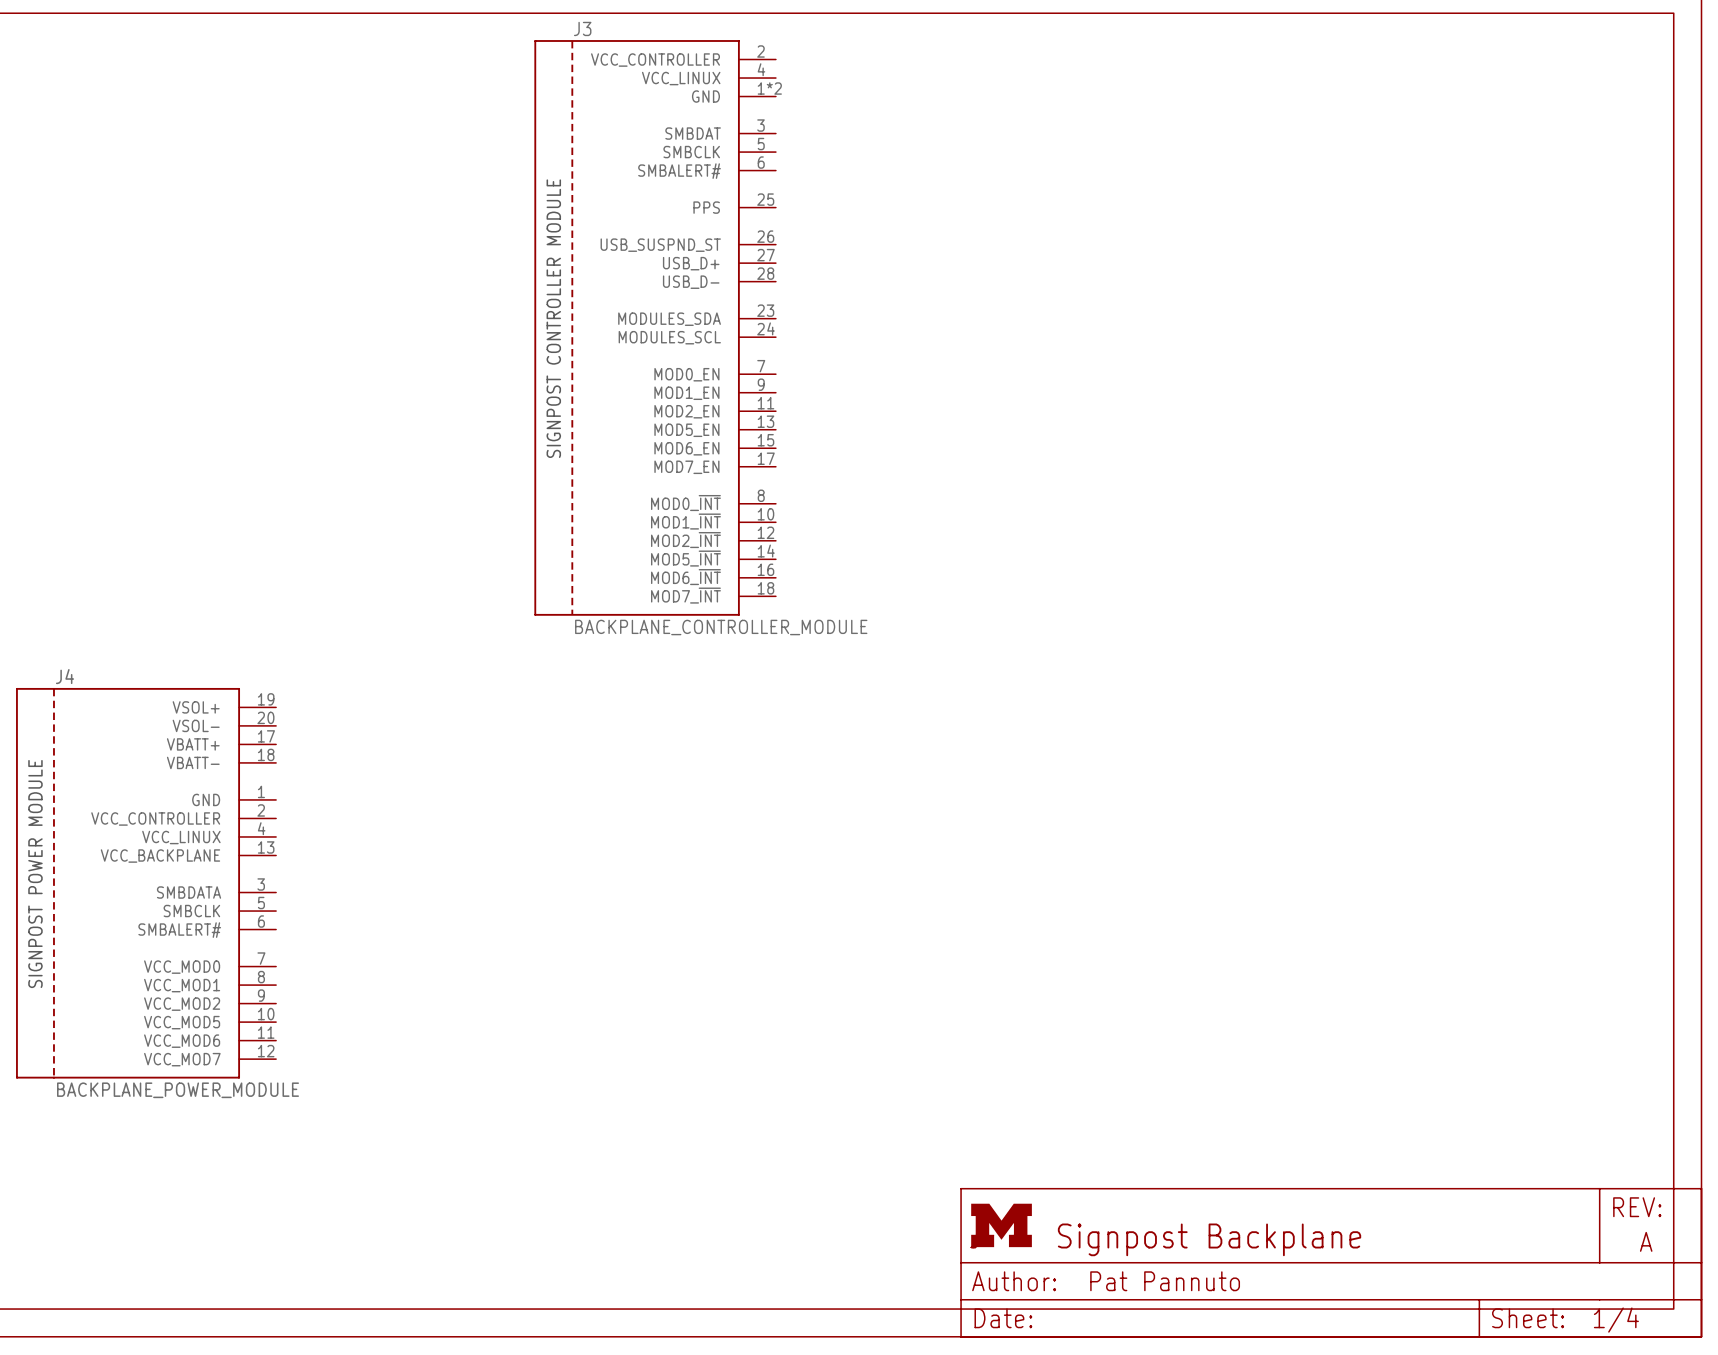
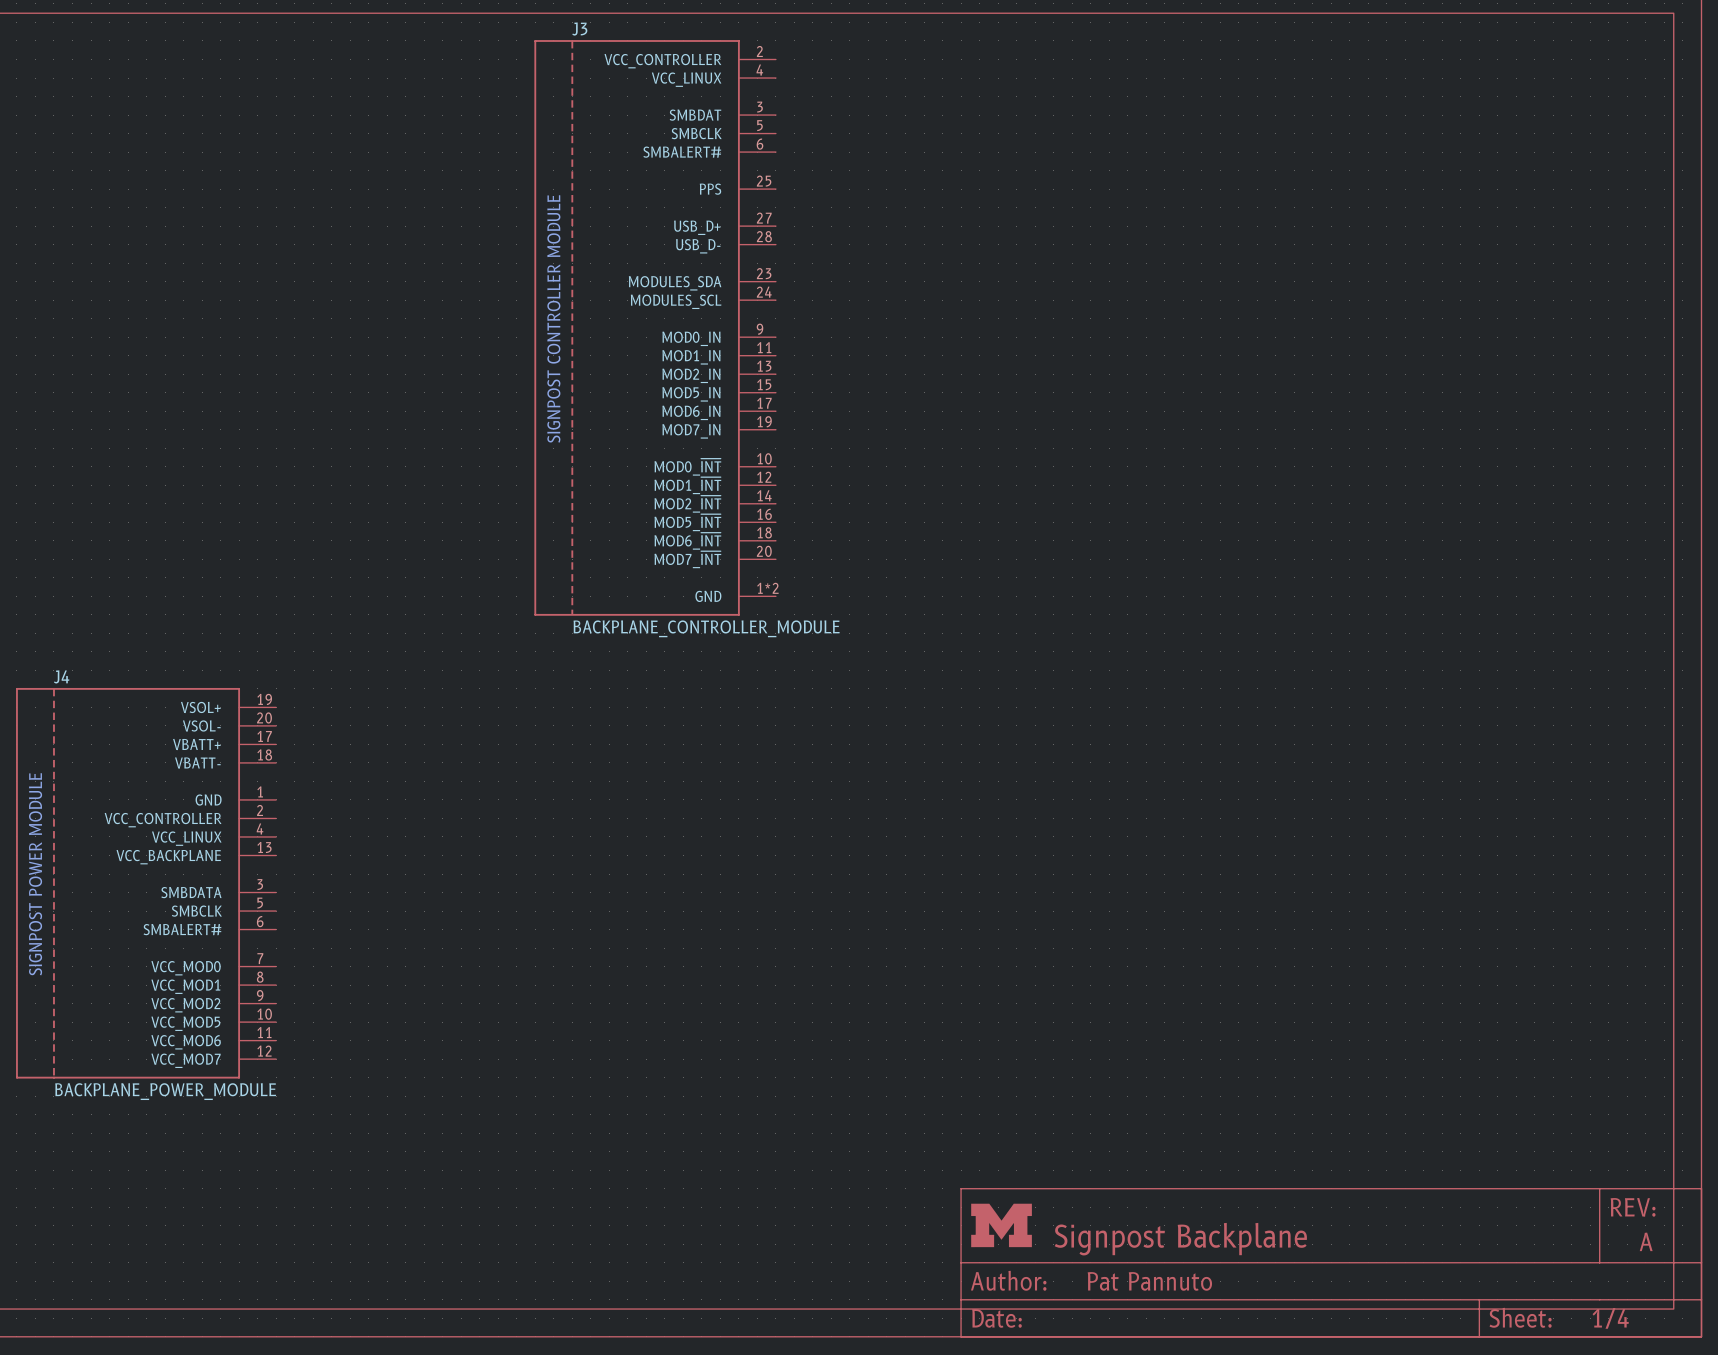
J3 symbol: [534, 40, 776, 616] -> [534, 40, 776, 616]

